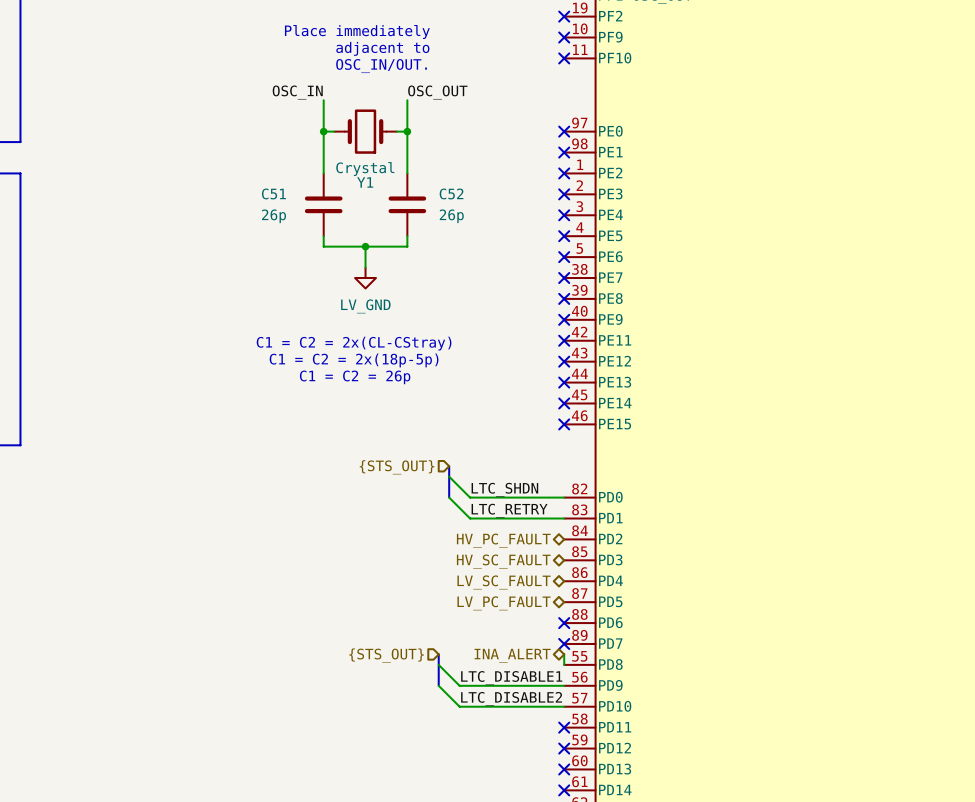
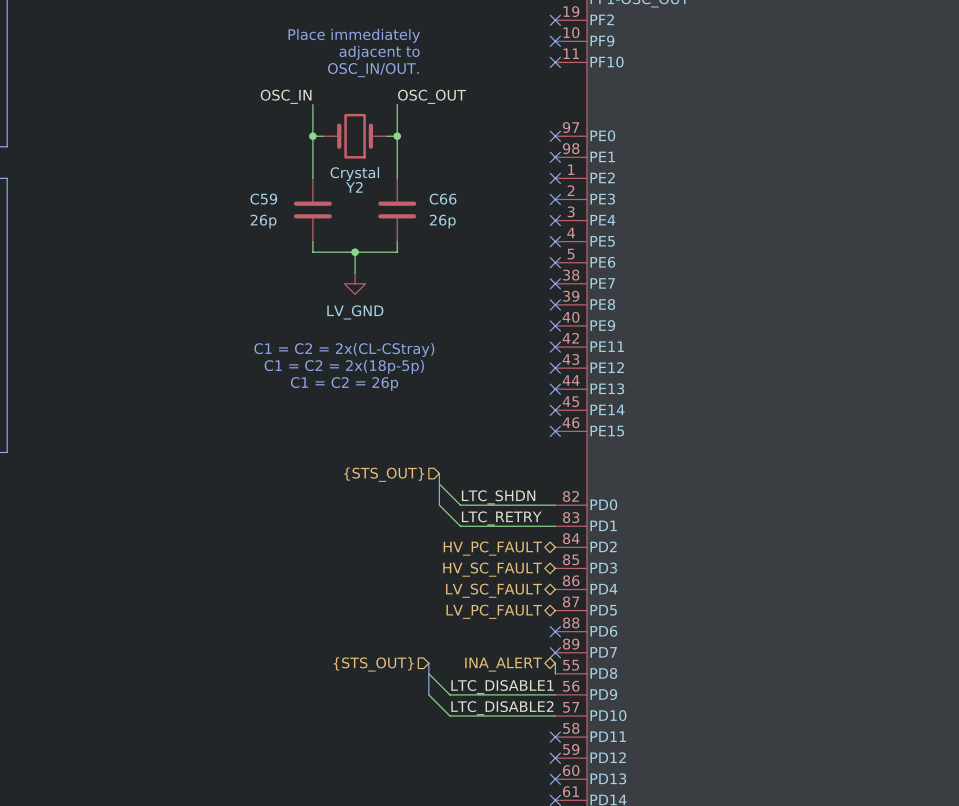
Y1 name: Y1 (365, 182) -> Y2 (354, 187)
C51 name: C51 (273, 193) -> C59 (263, 199)
C52 name: C52 (451, 193) -> C66 (443, 199)

